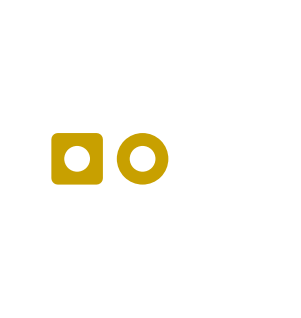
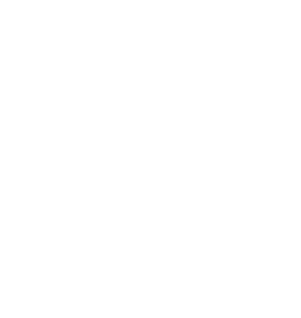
part: (109, 158) -> none

